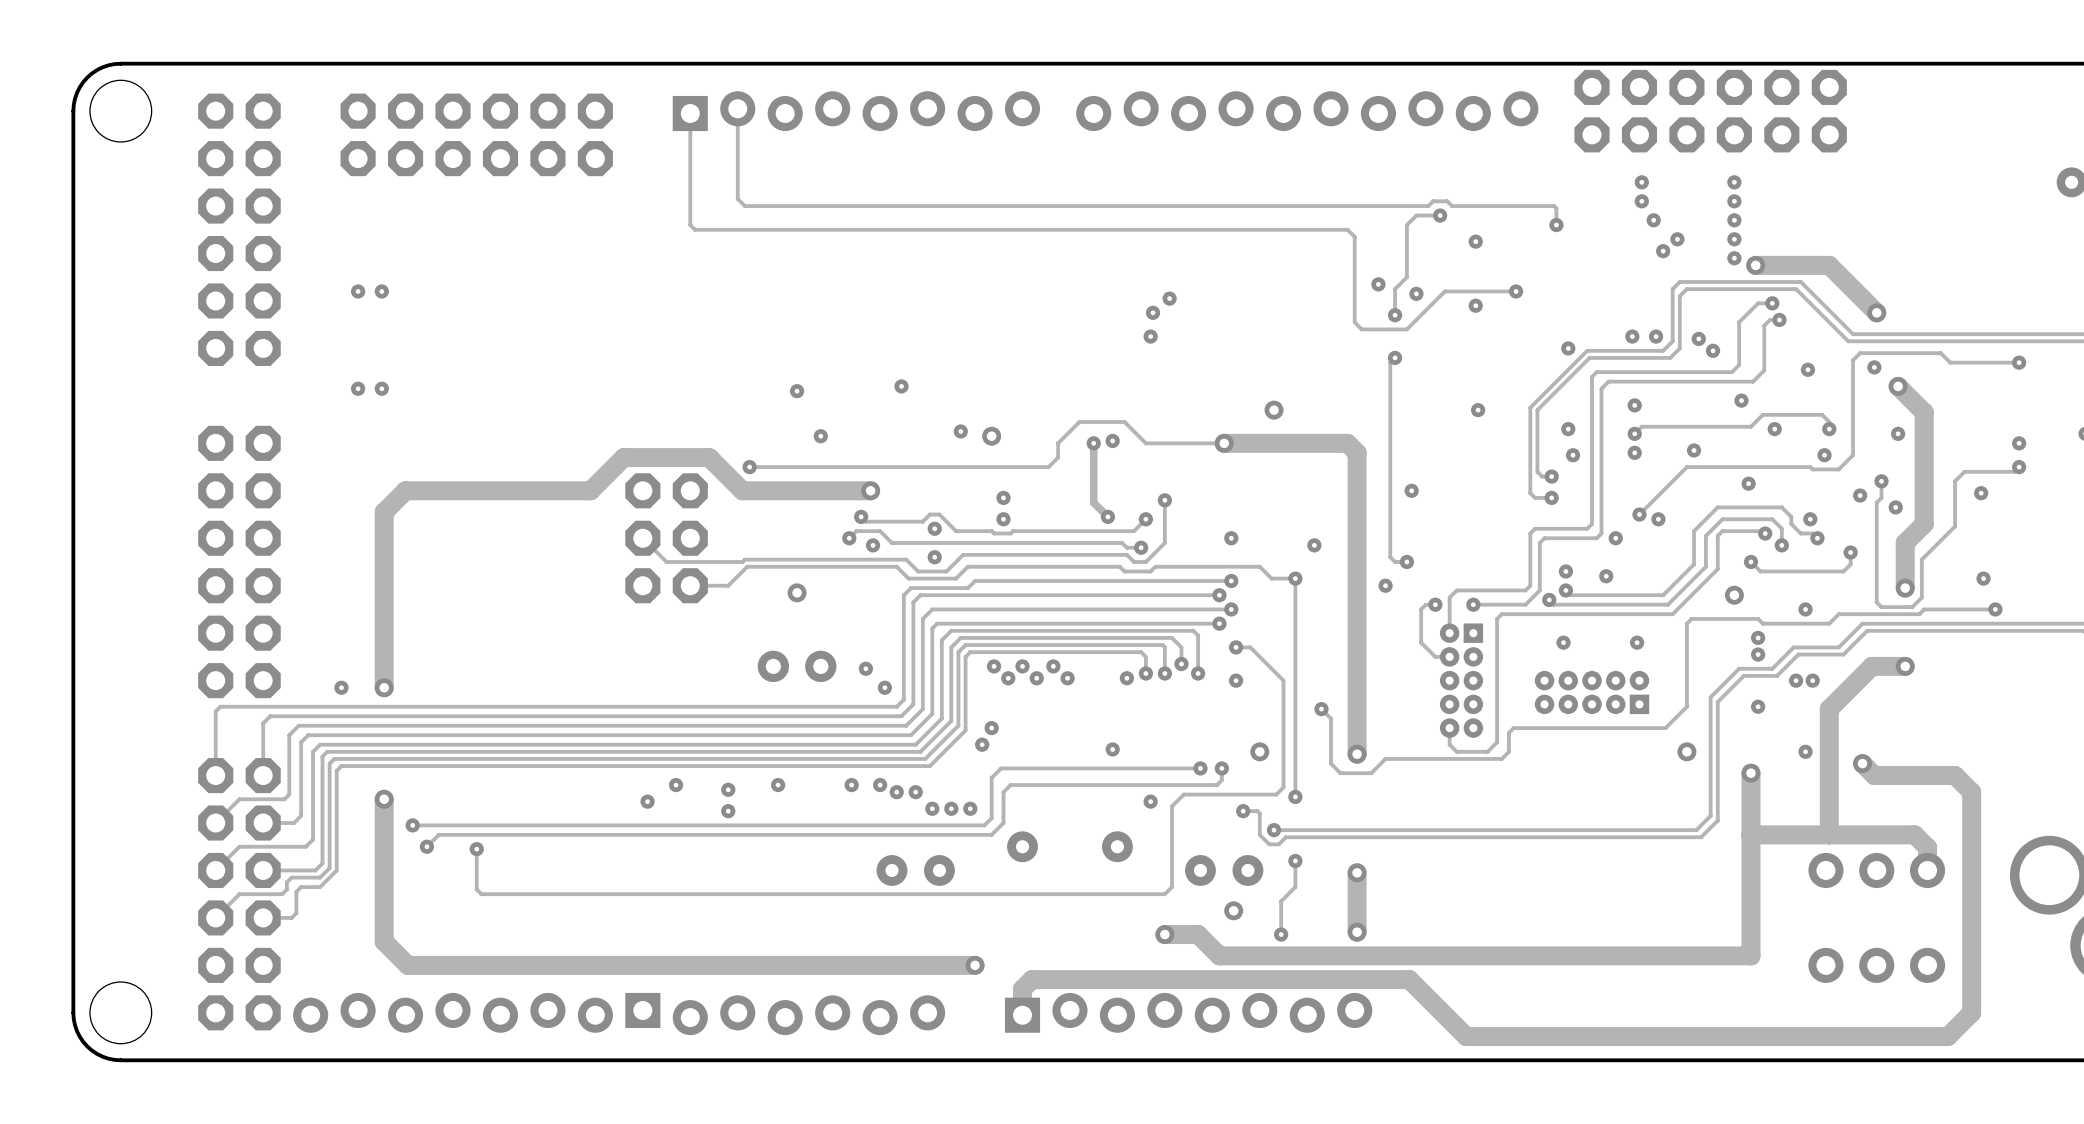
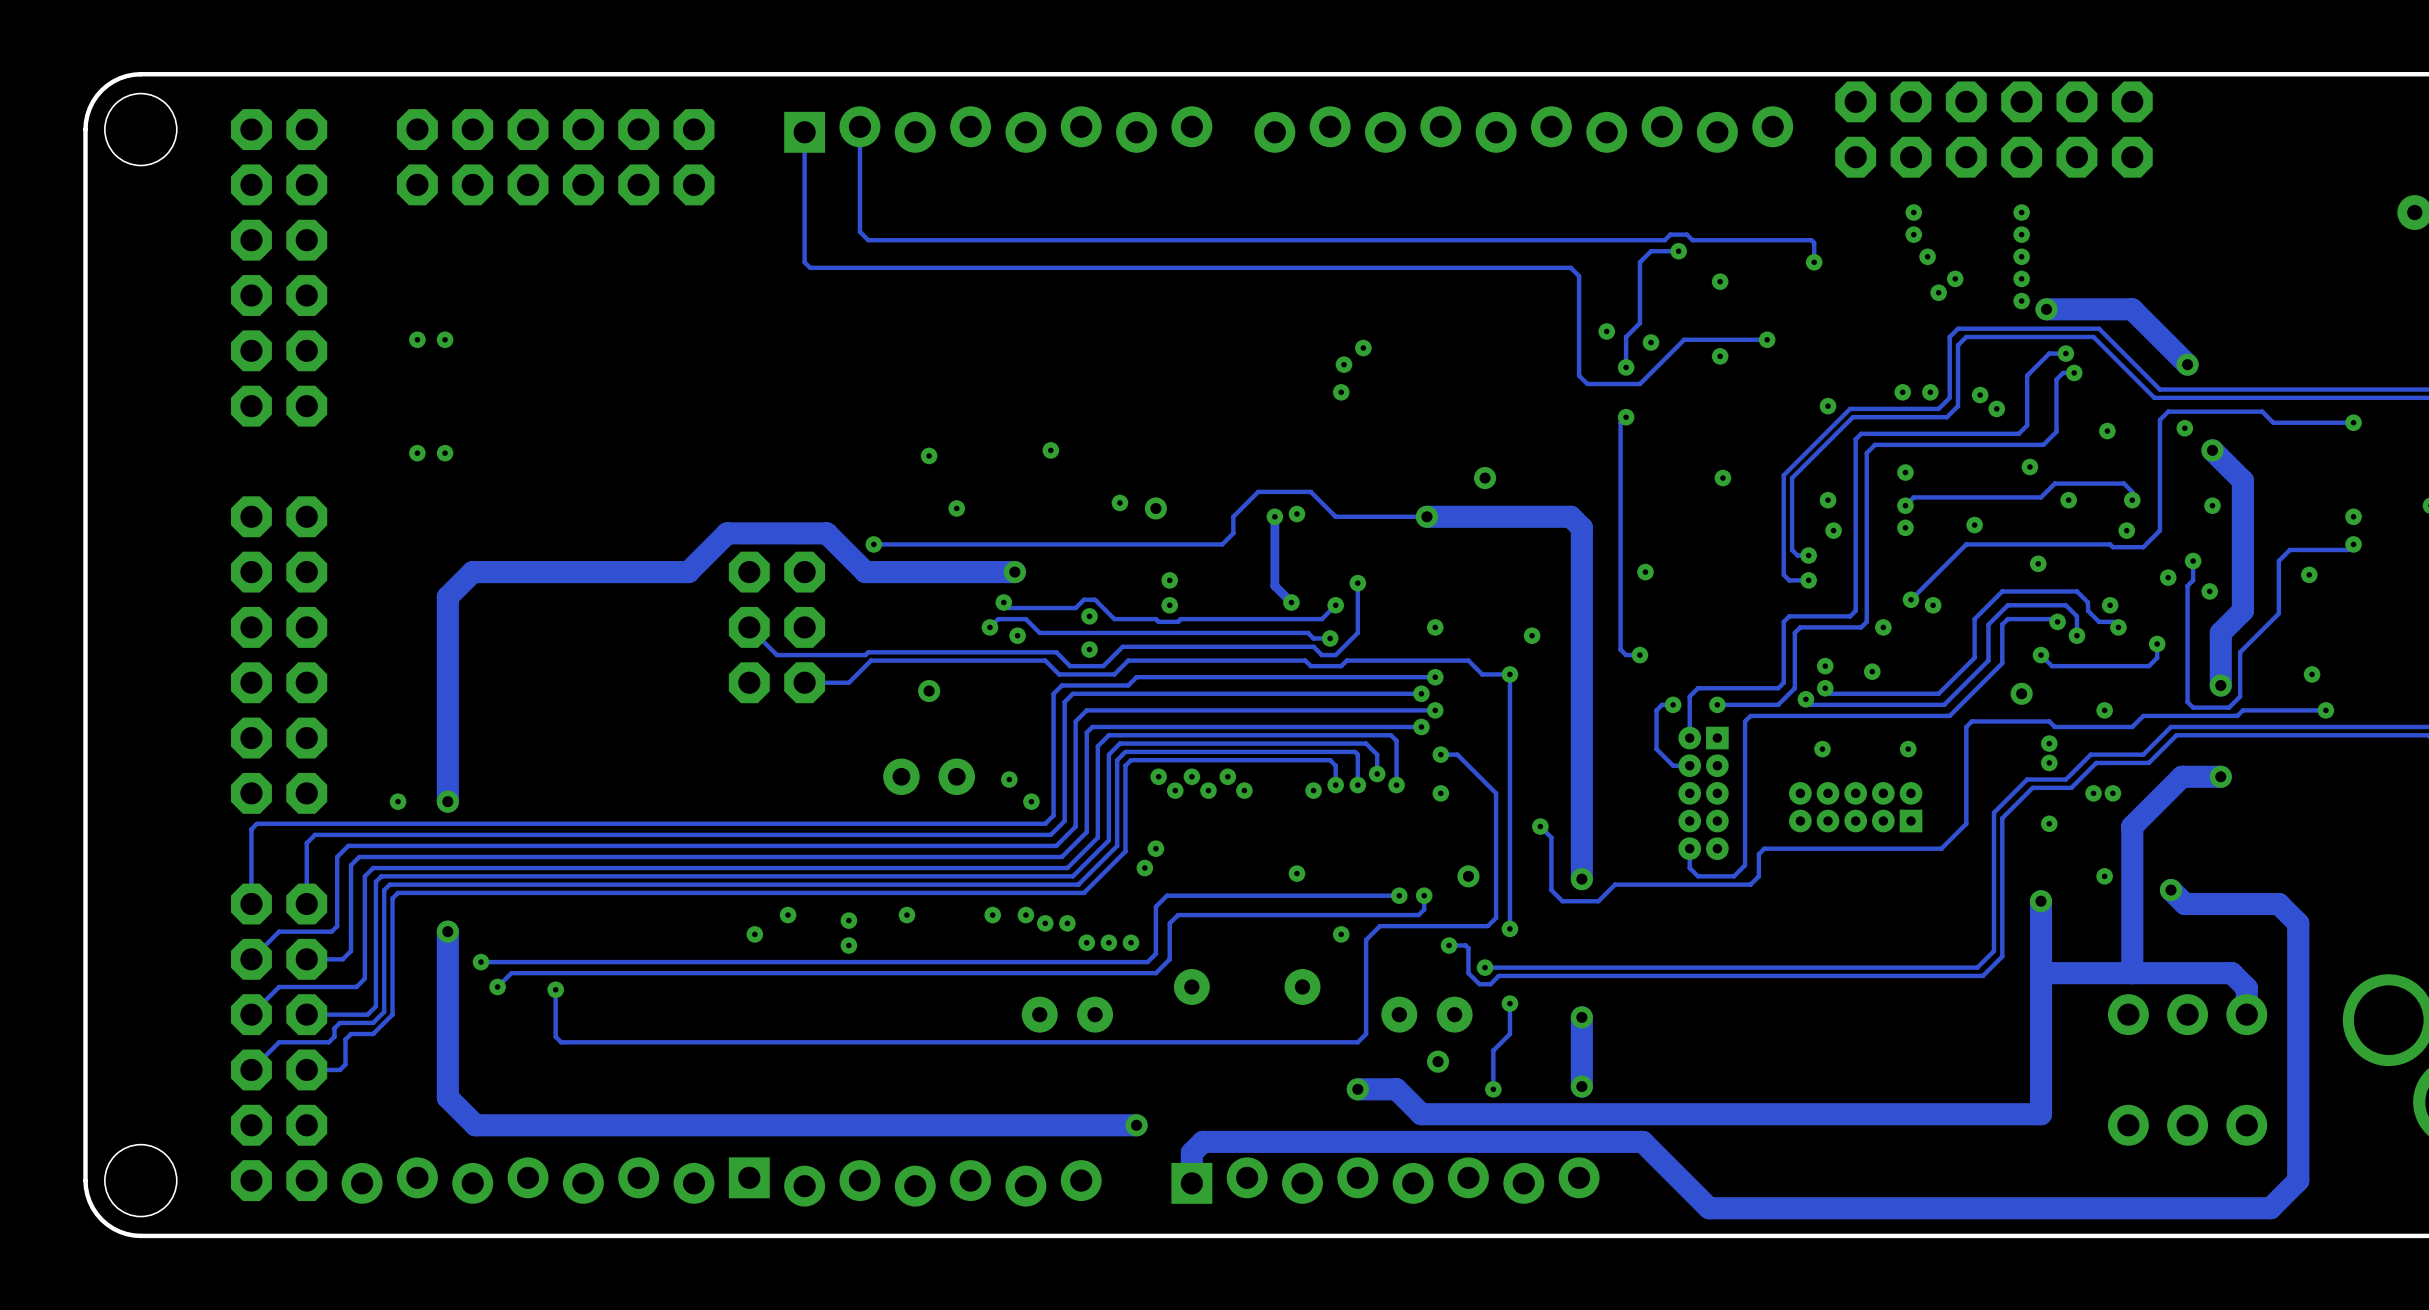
via: (1385, 585) -> none
via: (1686, 751) -> none

